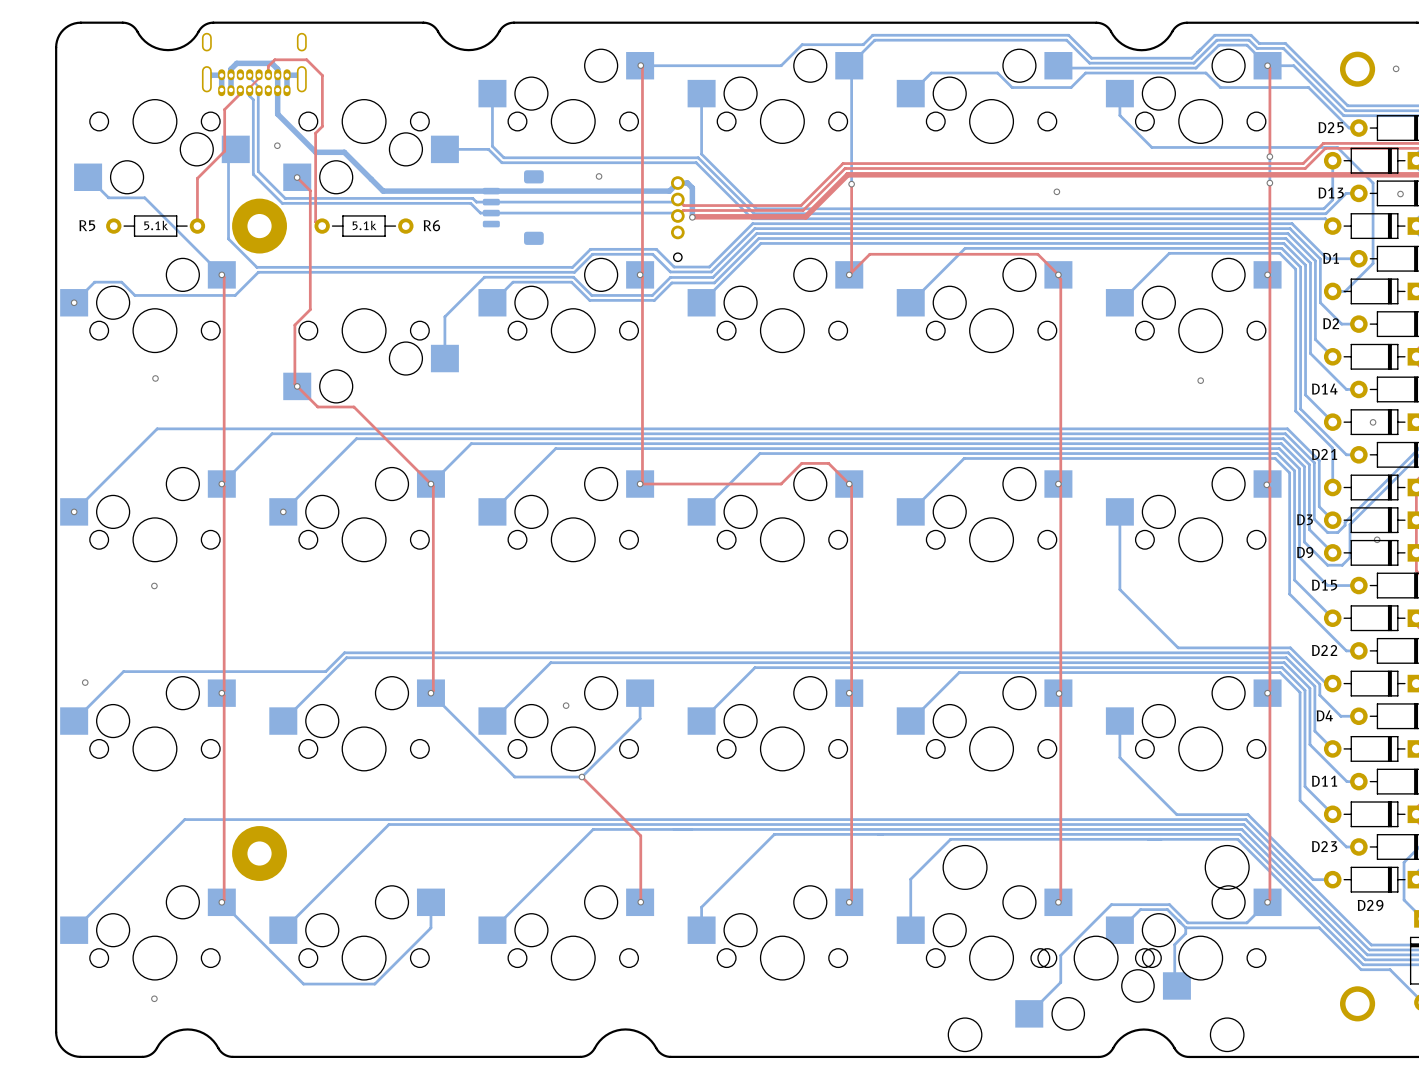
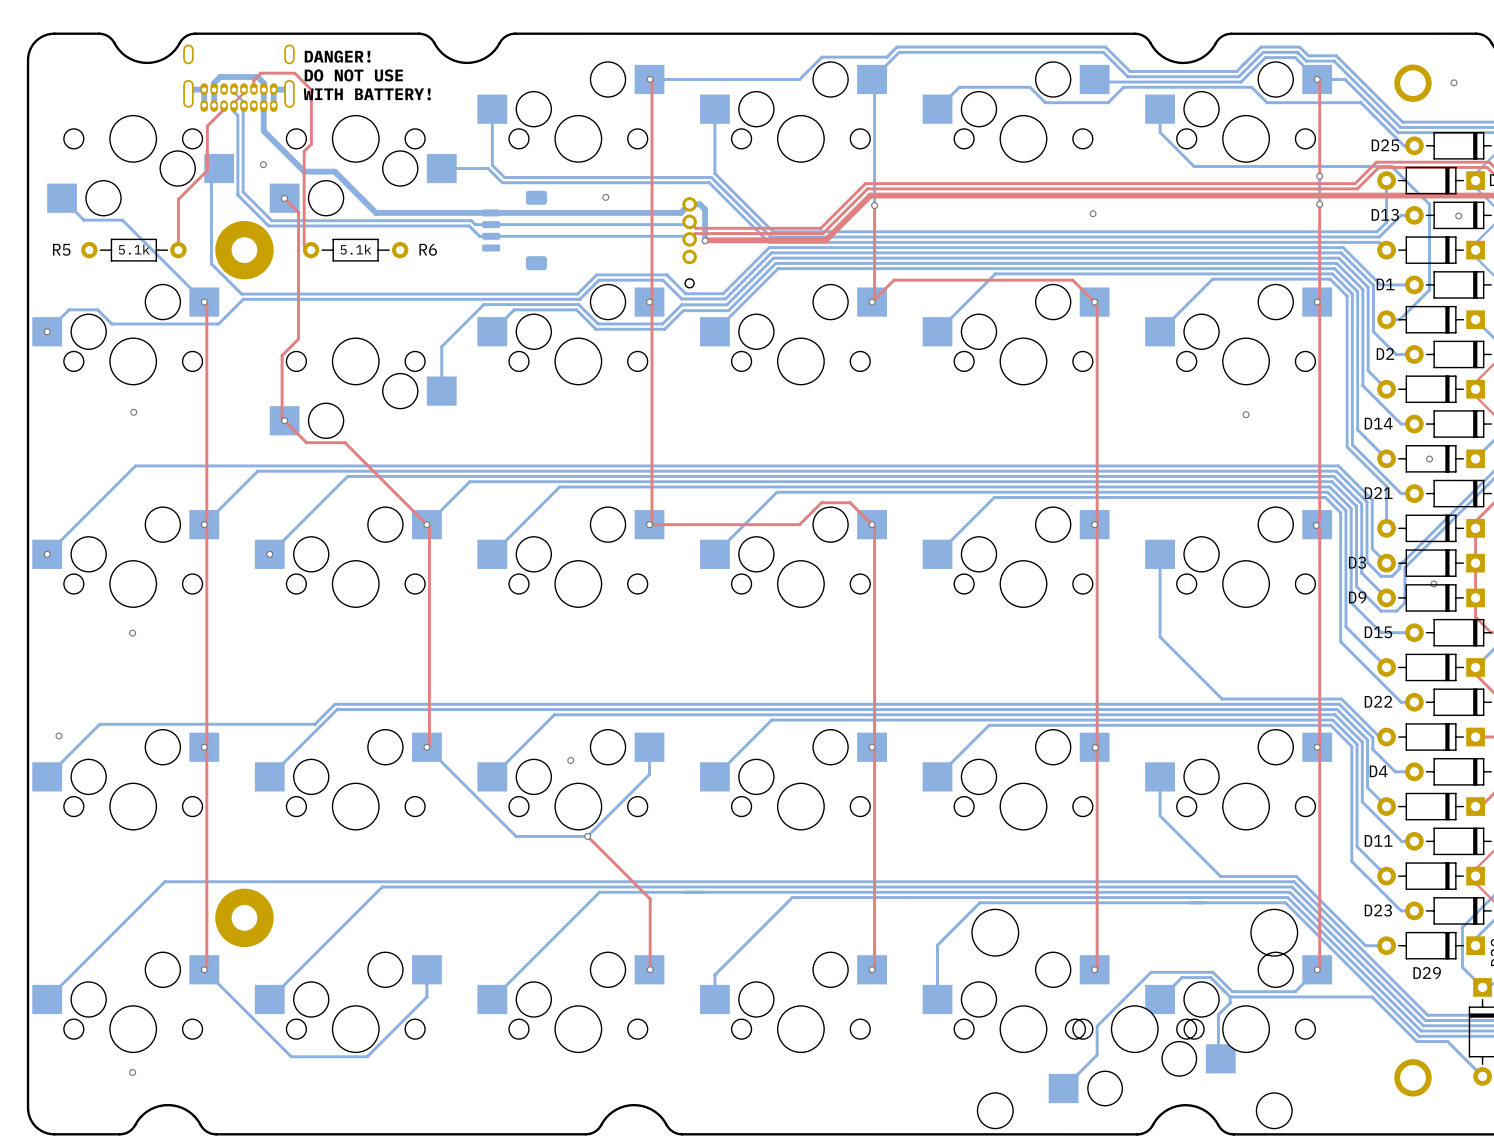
text: none -> DANGER! (337, 56)
text: none -> DO NOT USE (353, 75)
text: none -> WITH BATTERY! (367, 94)

